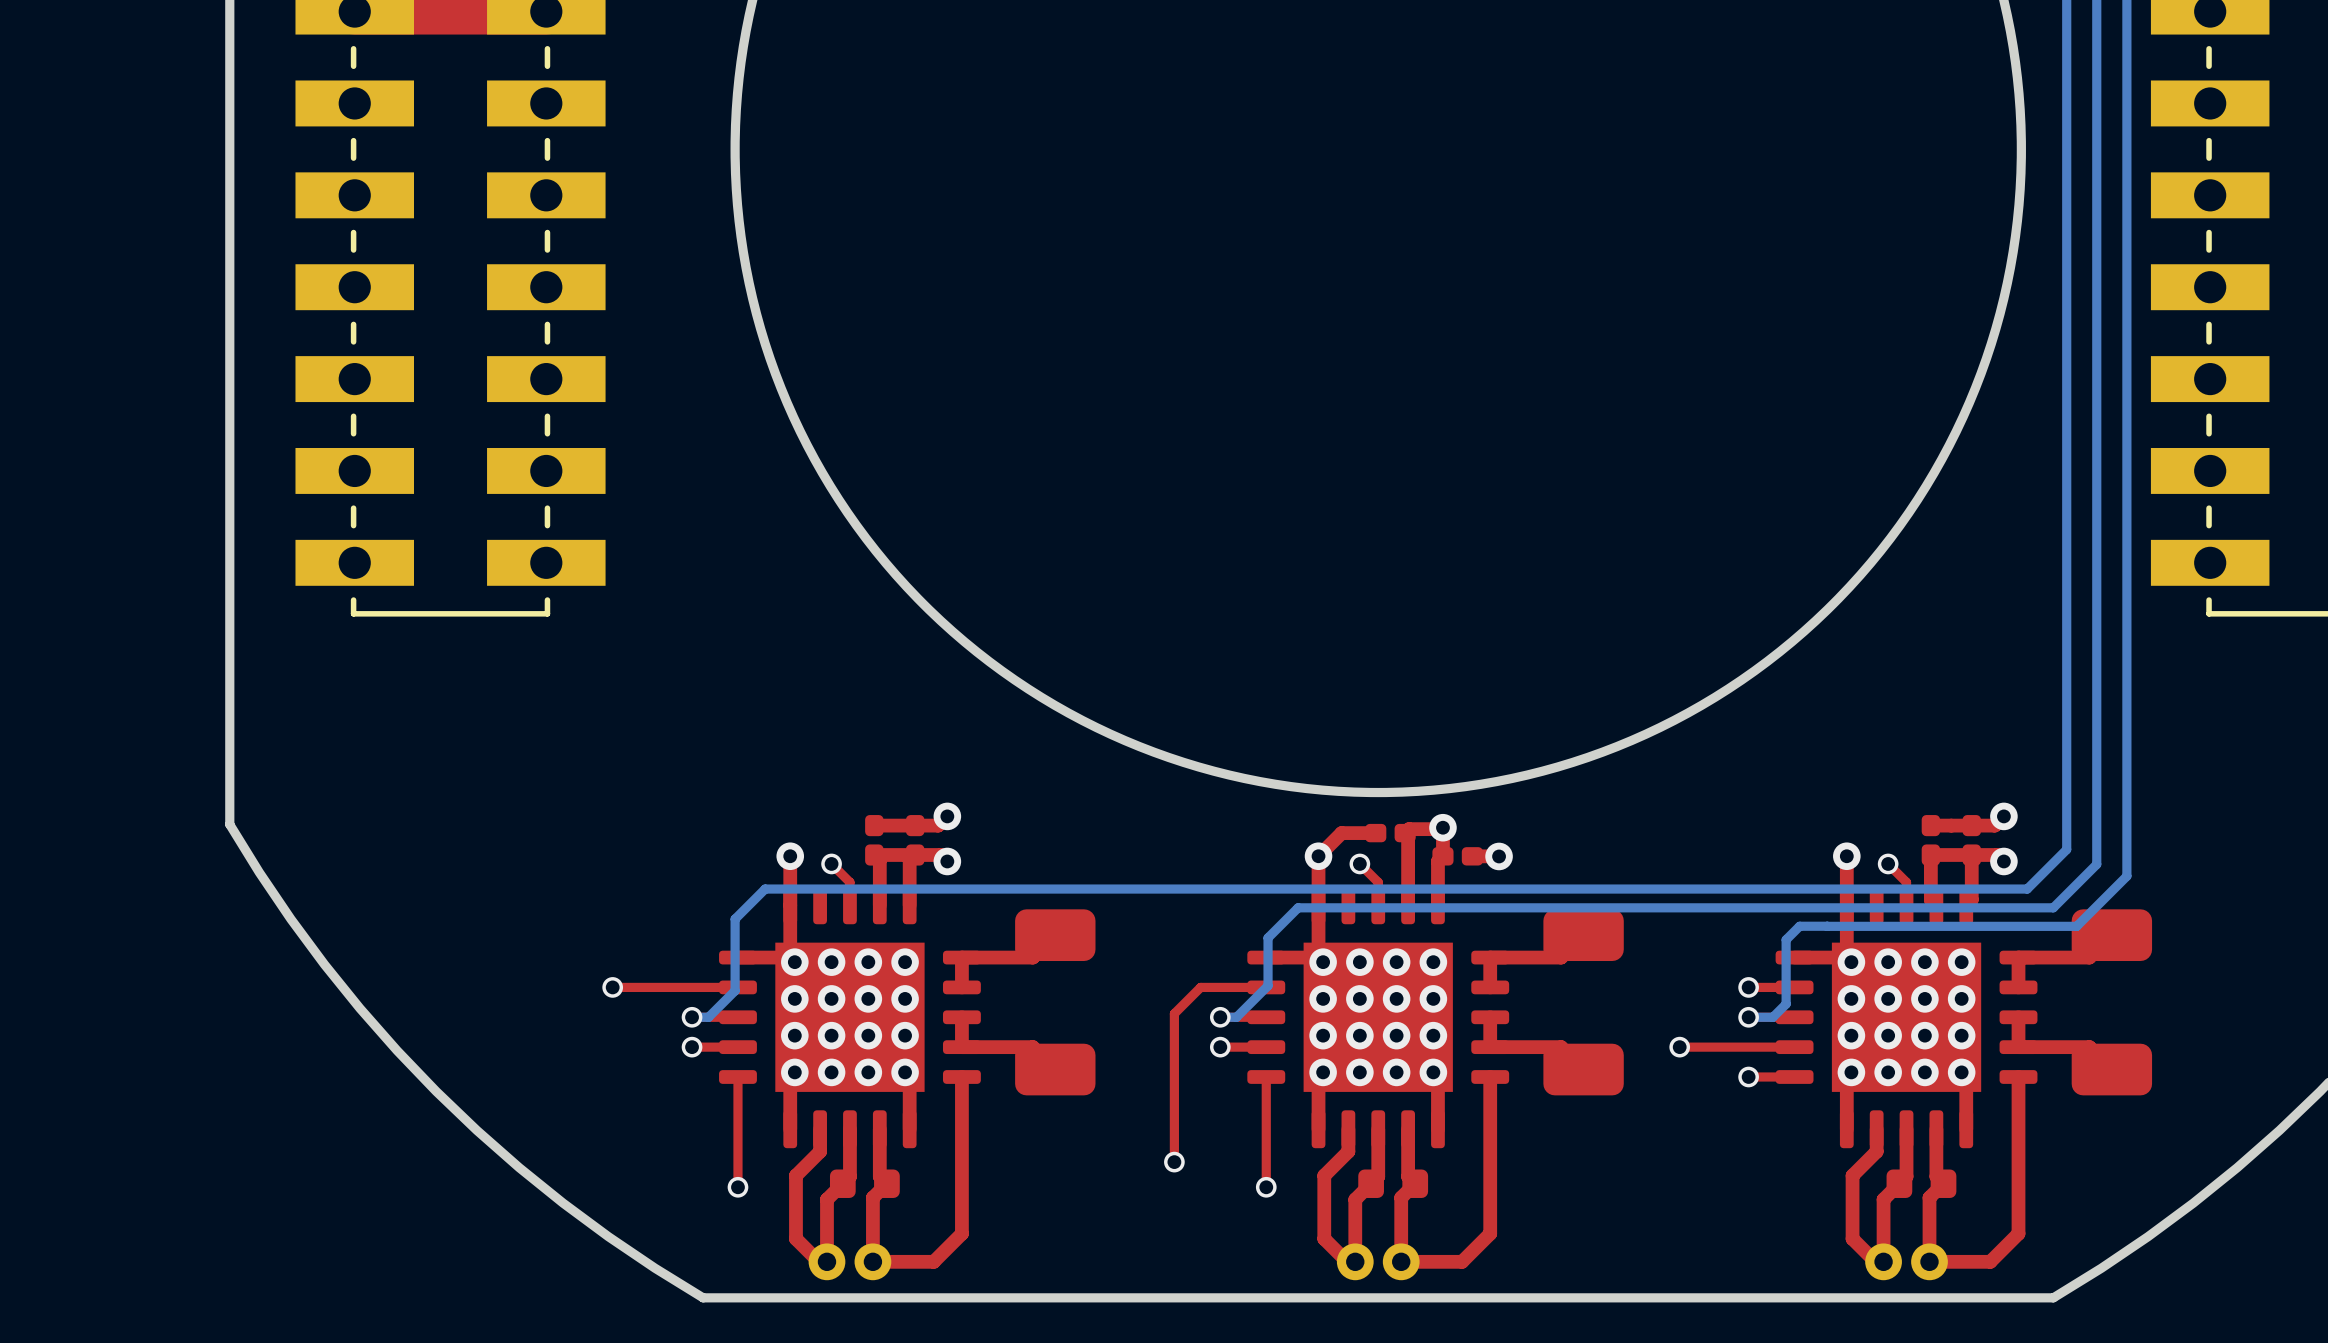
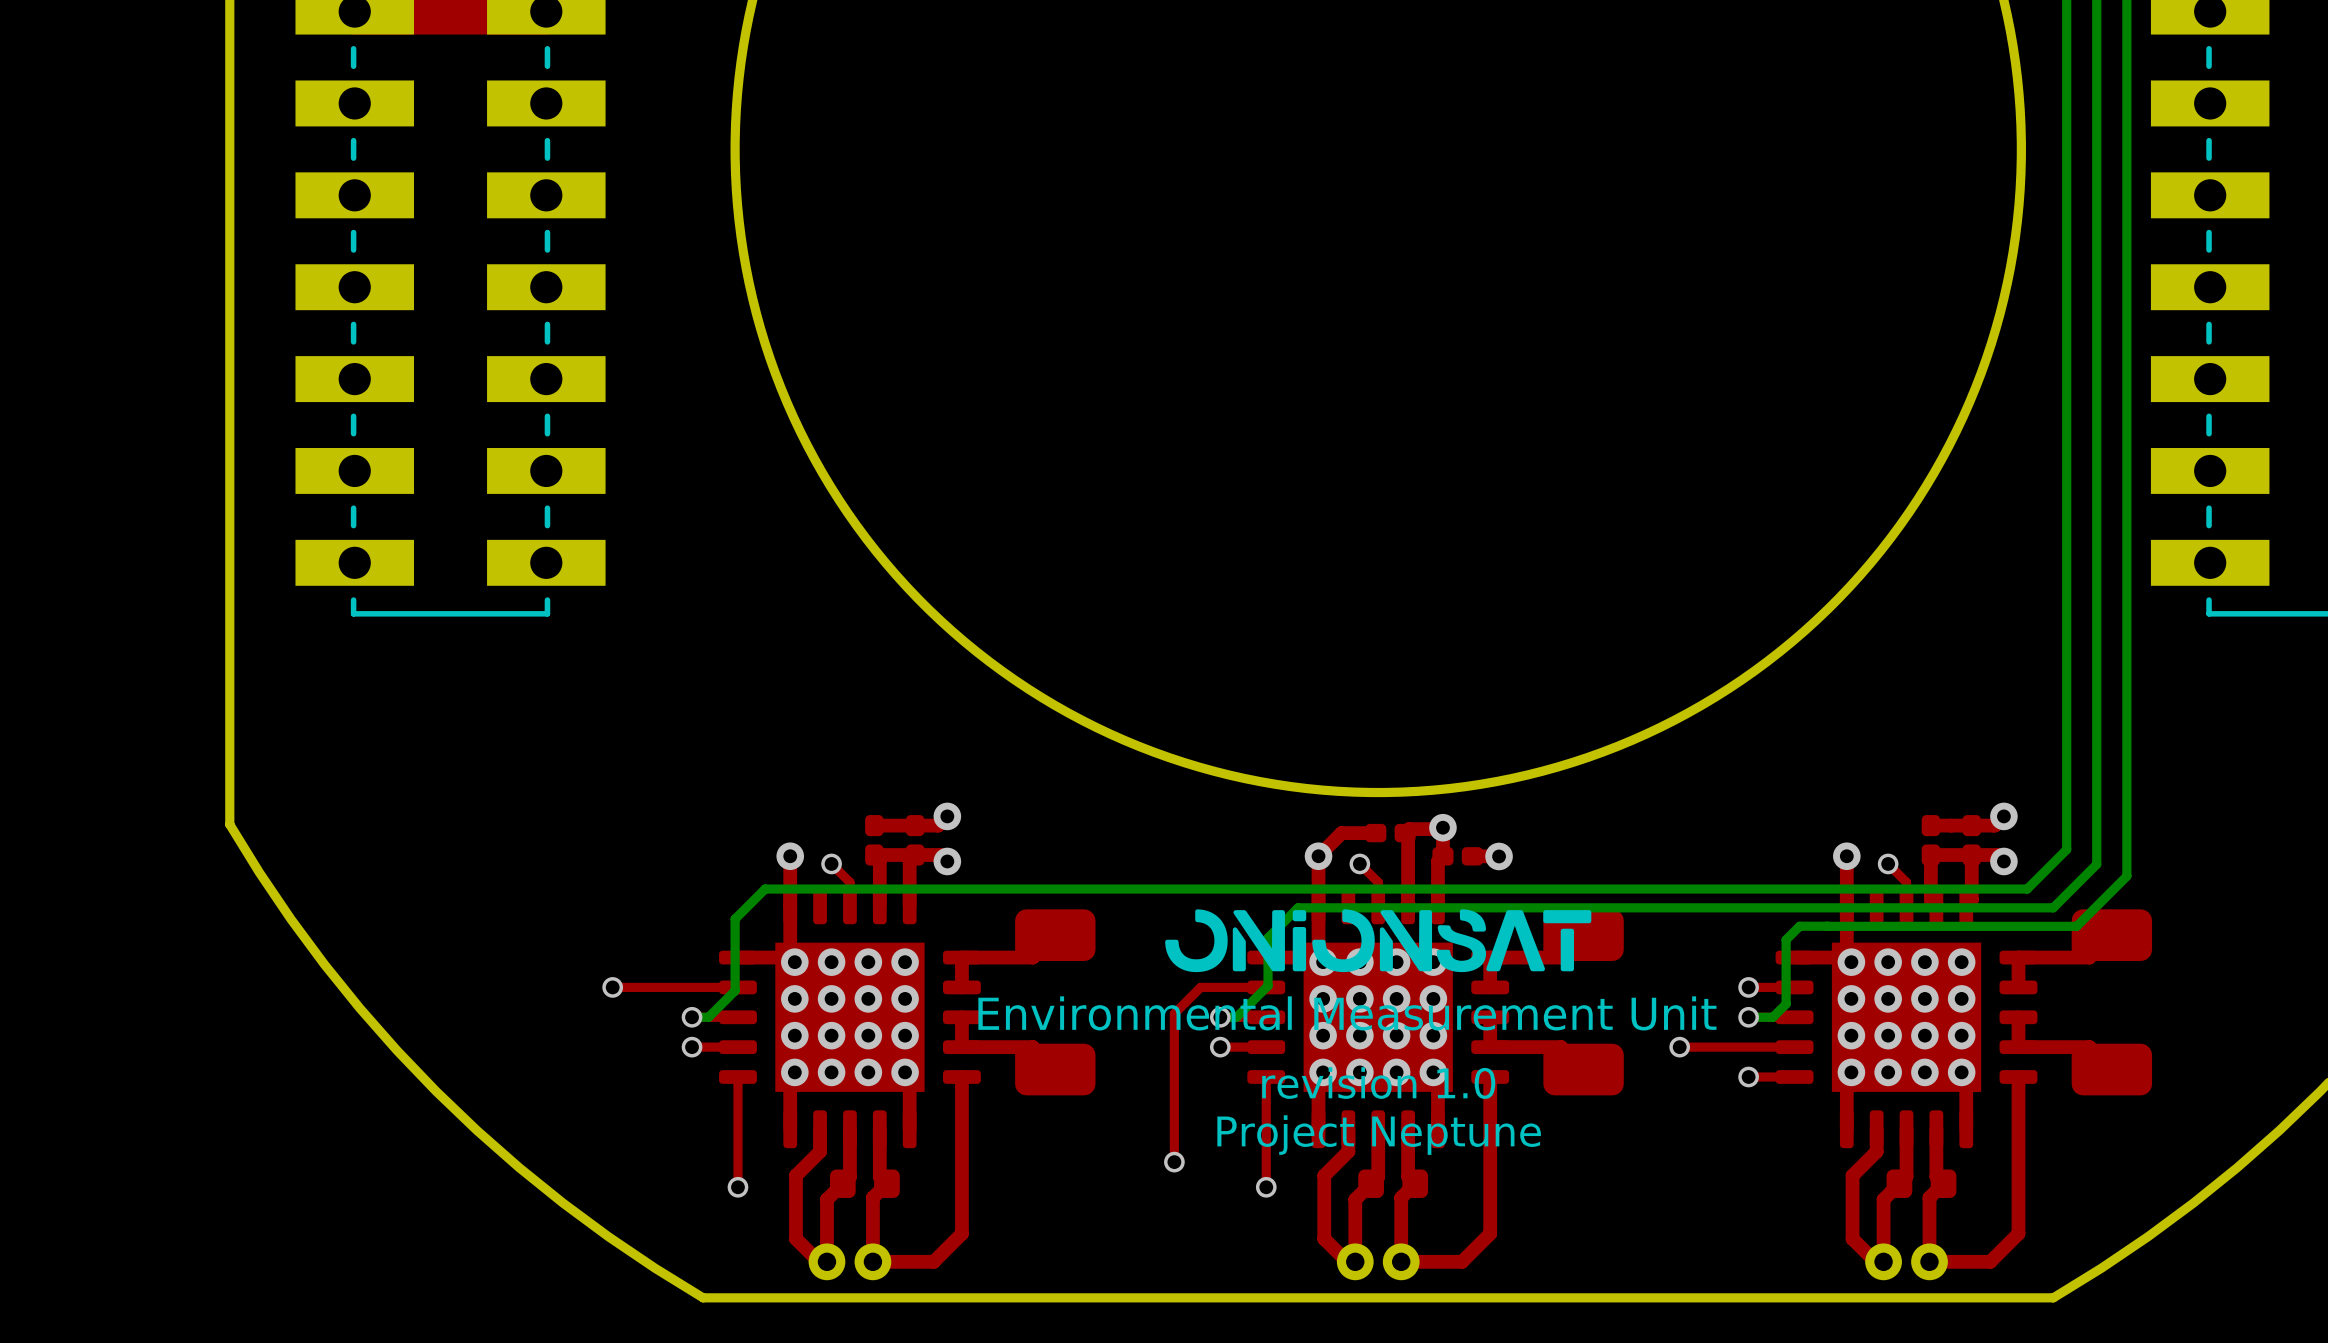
drawing: none -> [1165, 909, 1592, 973]
text: none -> Environmental Measurement Unit (1347, 1013)
text: none -> revision 1.0 (1378, 1083)
text: none -> Project Neptune (1379, 1135)

